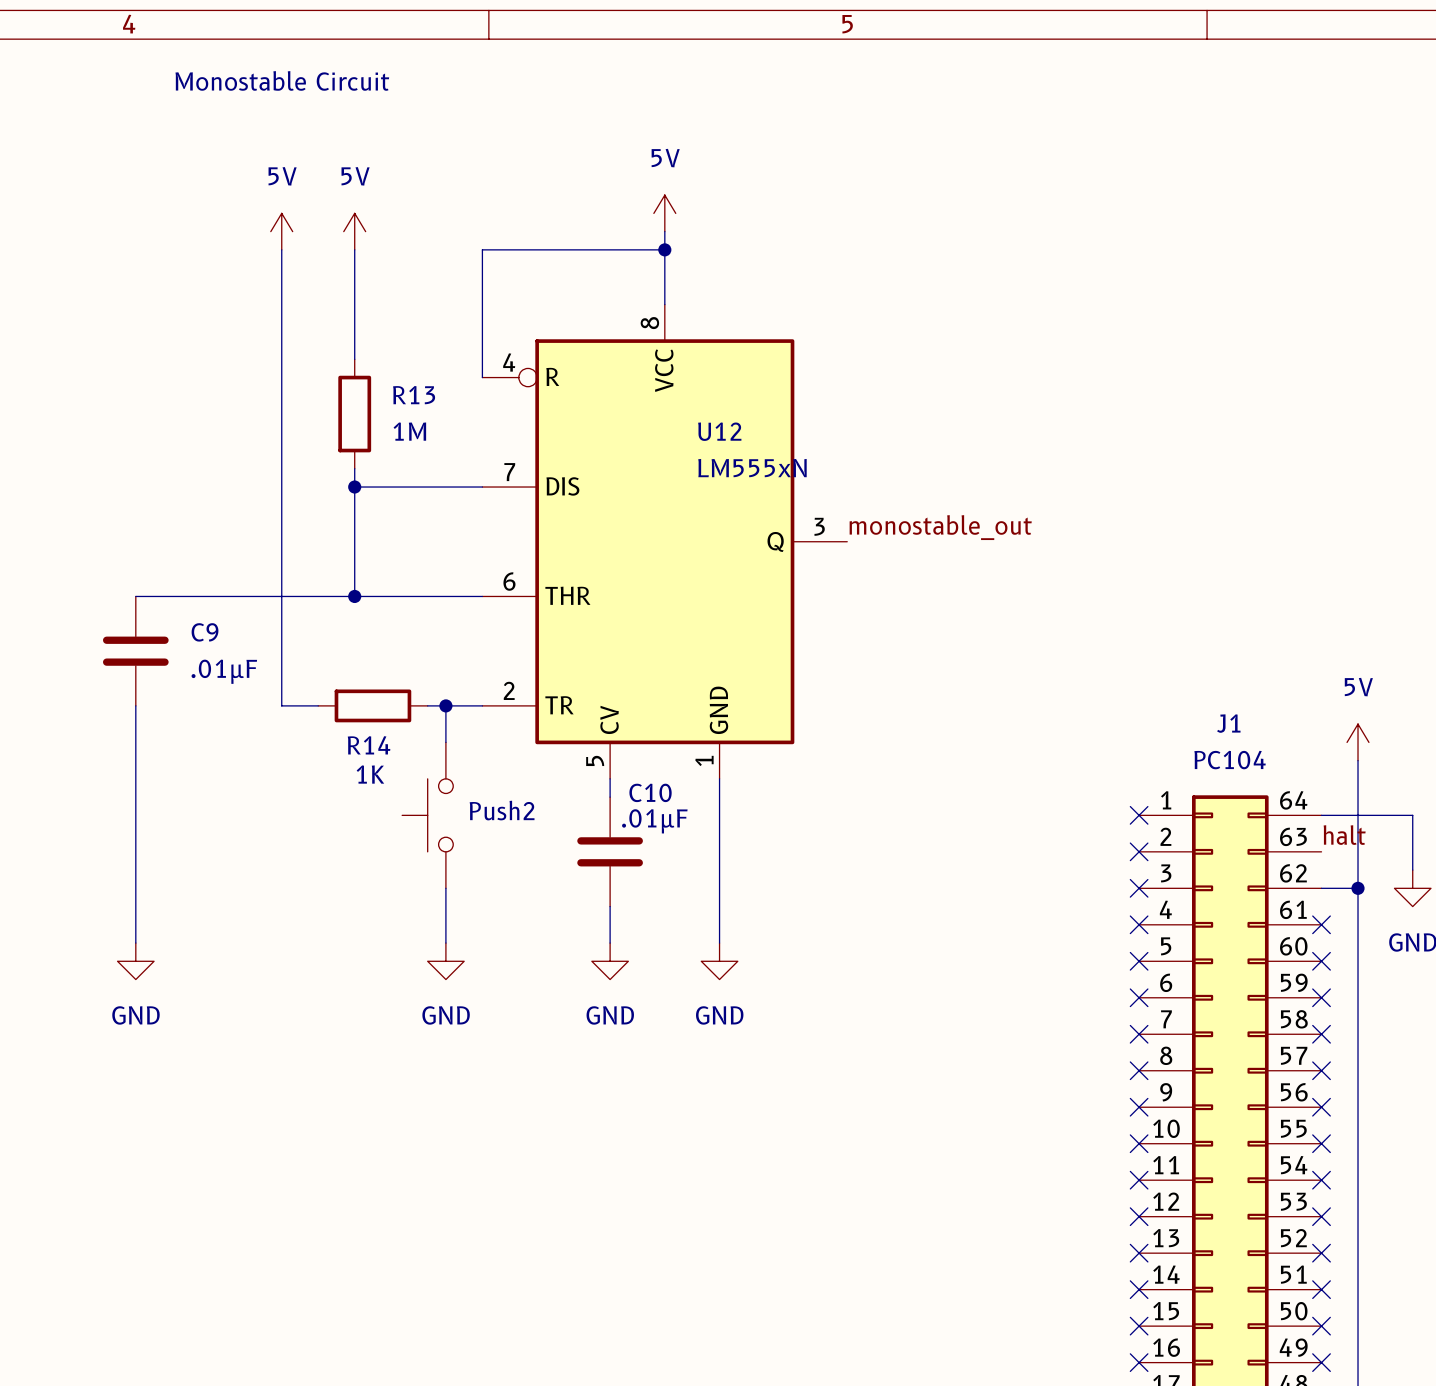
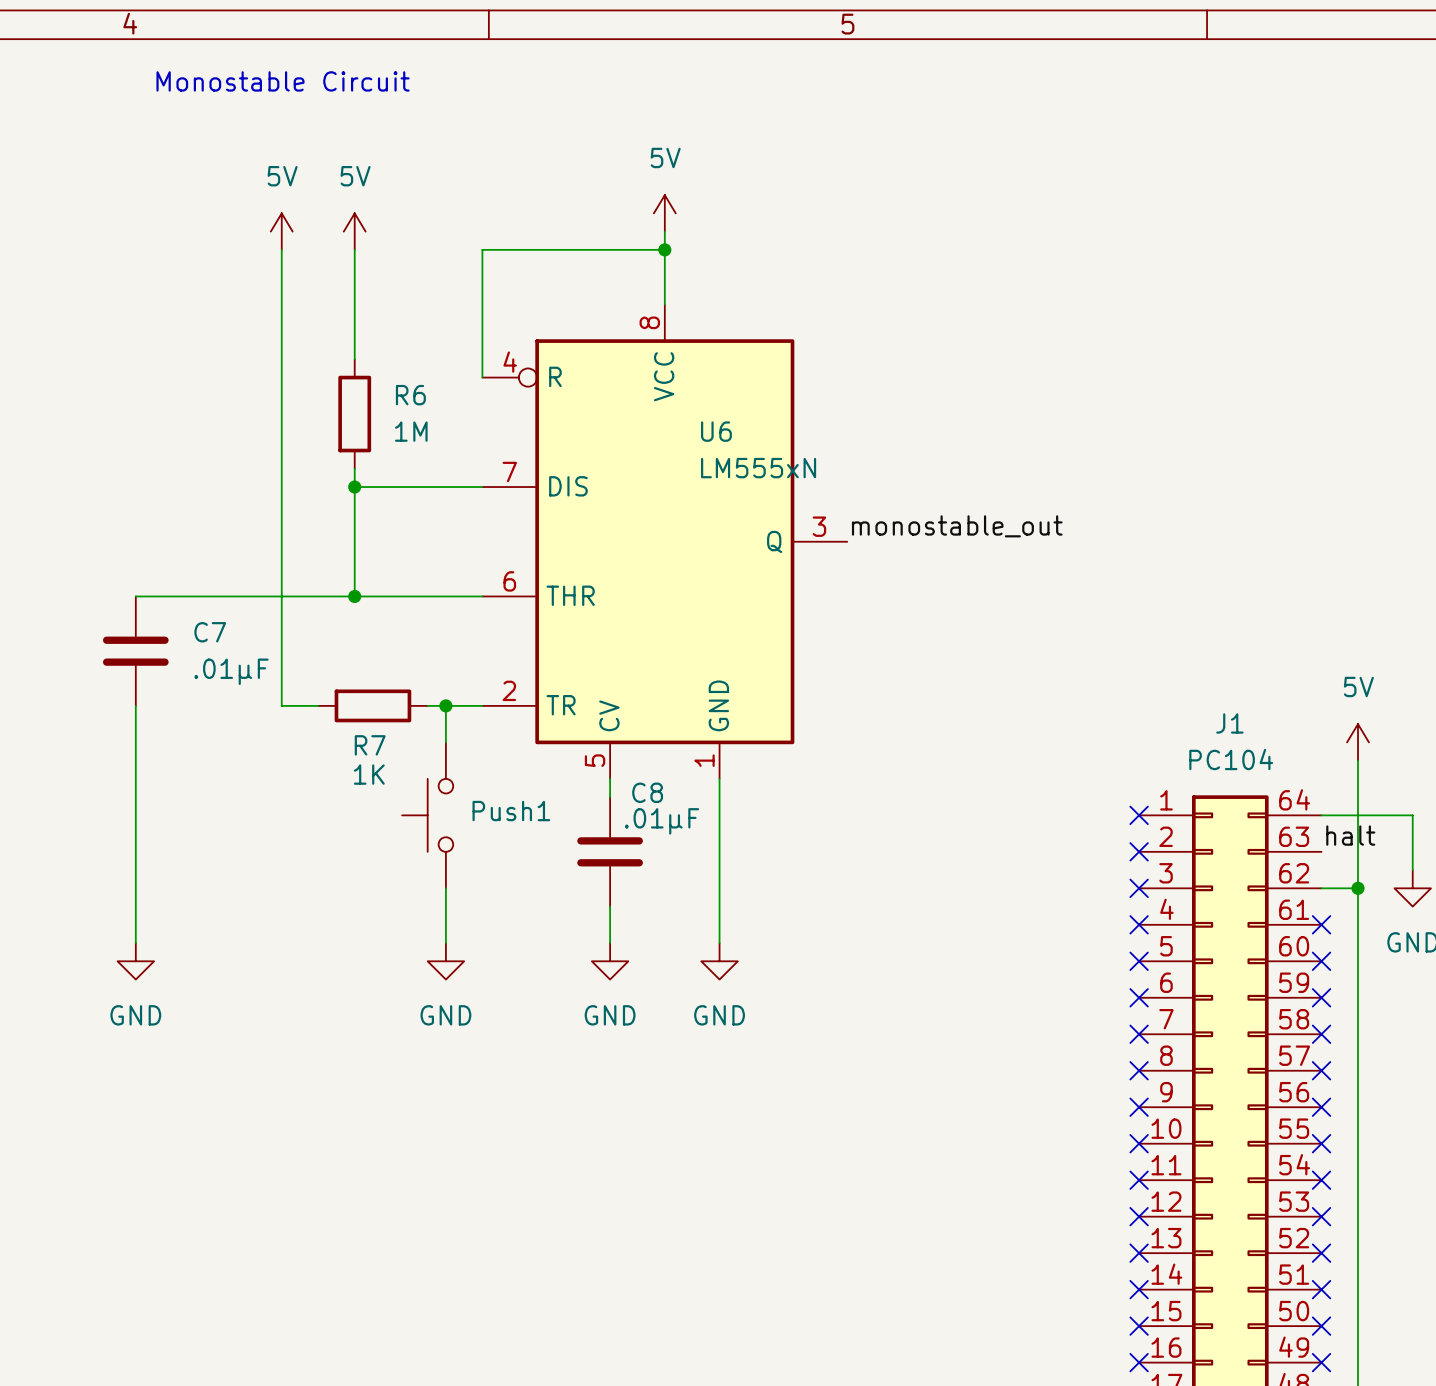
R13 name: R13 (414, 395) -> R6 (410, 395)
U12 name: U12 (719, 431) -> U6 (716, 431)
C9 name: C9 (205, 632) -> C7 (210, 632)
R14 name: R14 (369, 745) -> R7 (370, 745)
C10 name: C10 (650, 792) -> C8 (647, 792)
Push2 name: Push2 (502, 810) -> Push1 (511, 811)

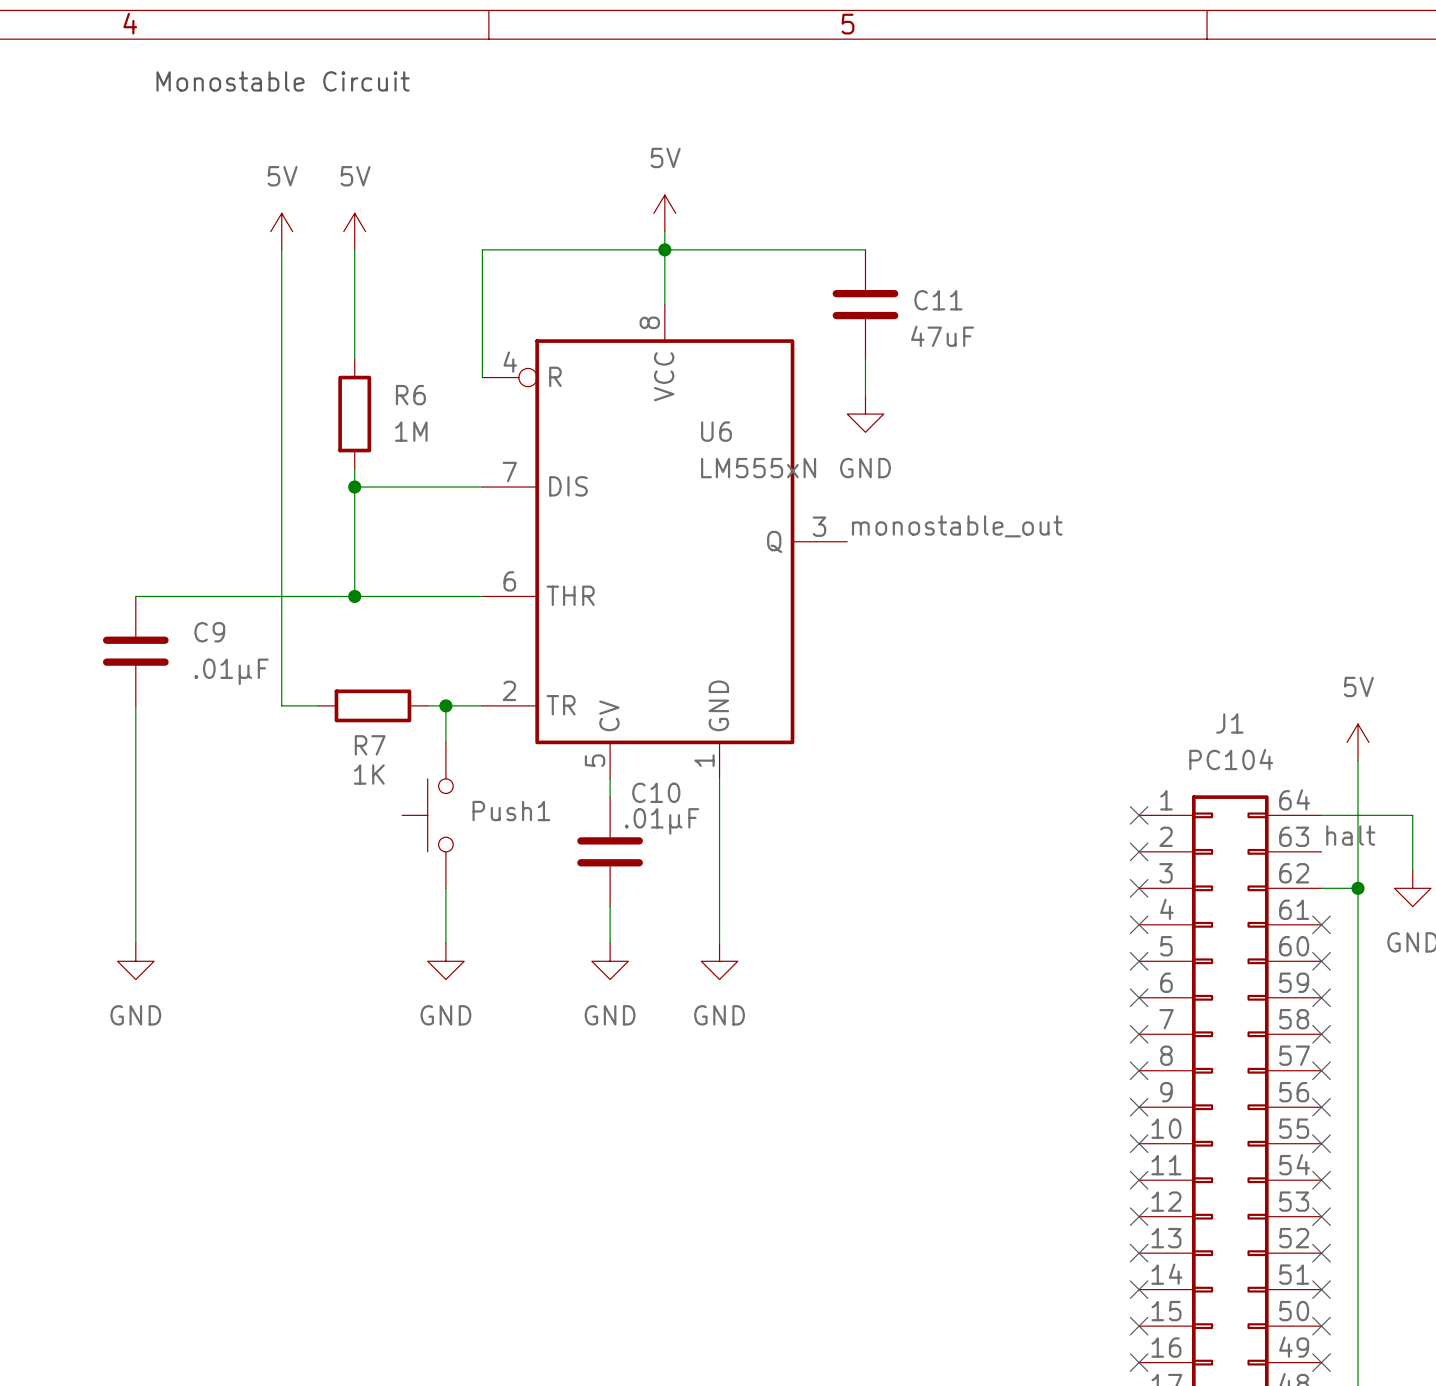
wire: none -> (664, 249) (865, 249)
C11: none -> 47uF (865, 304)
wire: none -> (865, 359) (865, 395)
power symbol: none -> GND (865, 414)
C7 name: C7 (210, 632) -> C9 (209, 632)
C8 name: C8 (647, 792) -> C10 (656, 792)

